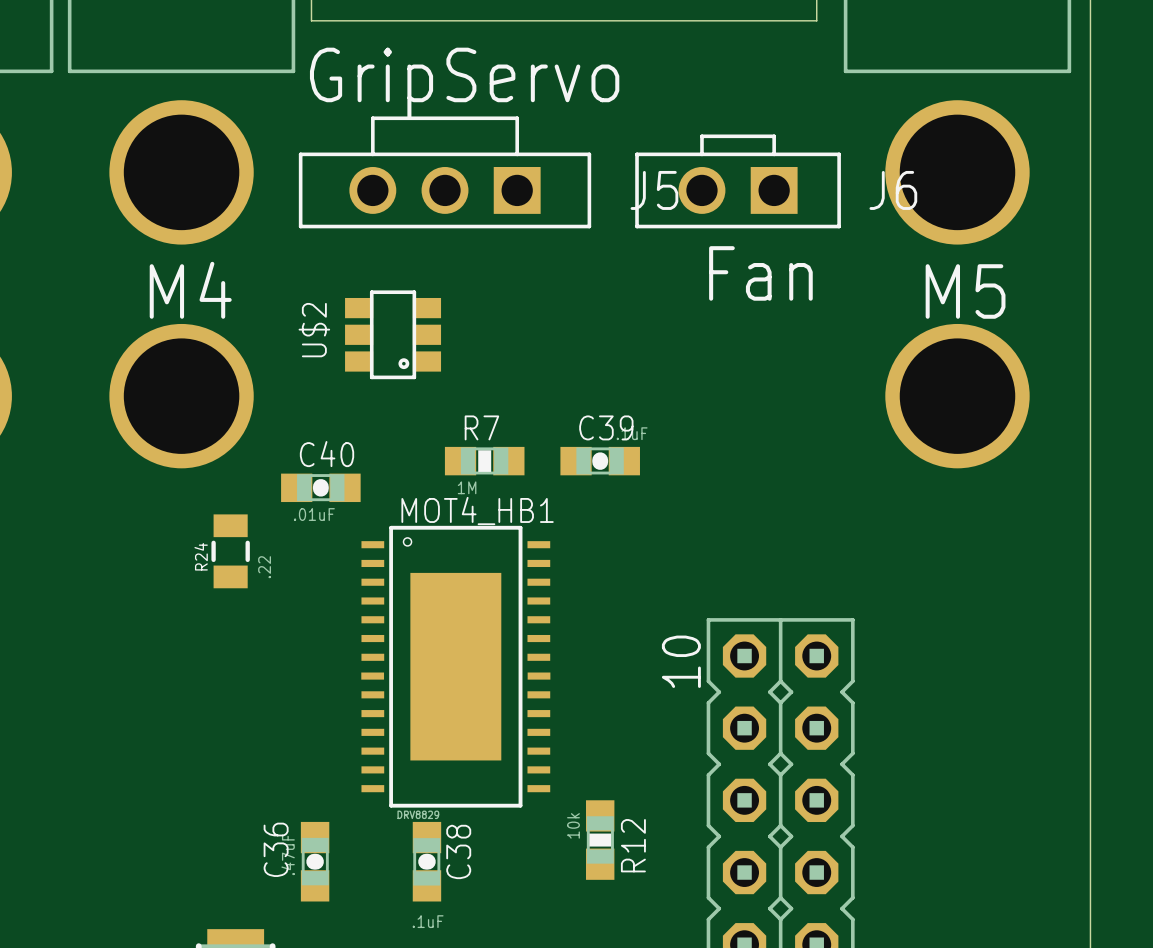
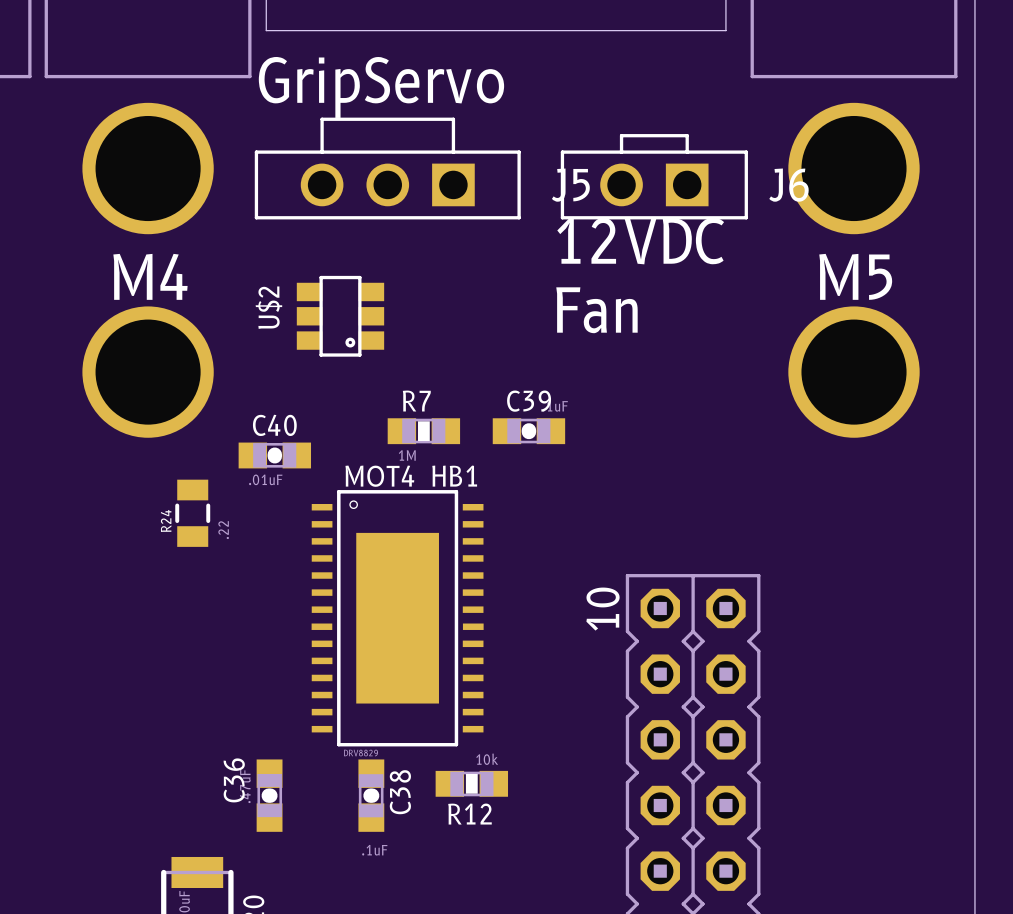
text: none -> 12VDC (640, 241)
text position: Fan (760, 273) -> Fan (596, 310)
R12 rotation: 0° (600, 840) -> 90° clockwise (471, 783)
R12 position: (600, 840) -> (471, 783)

